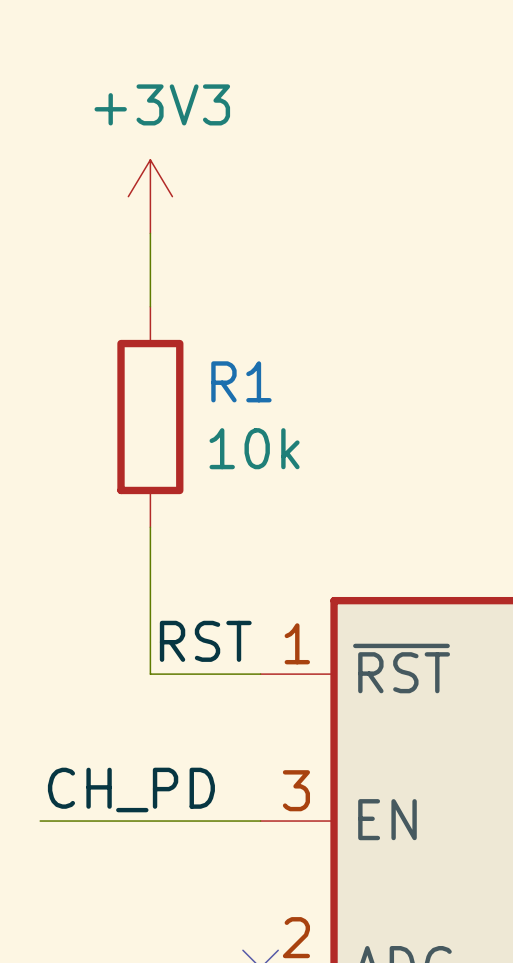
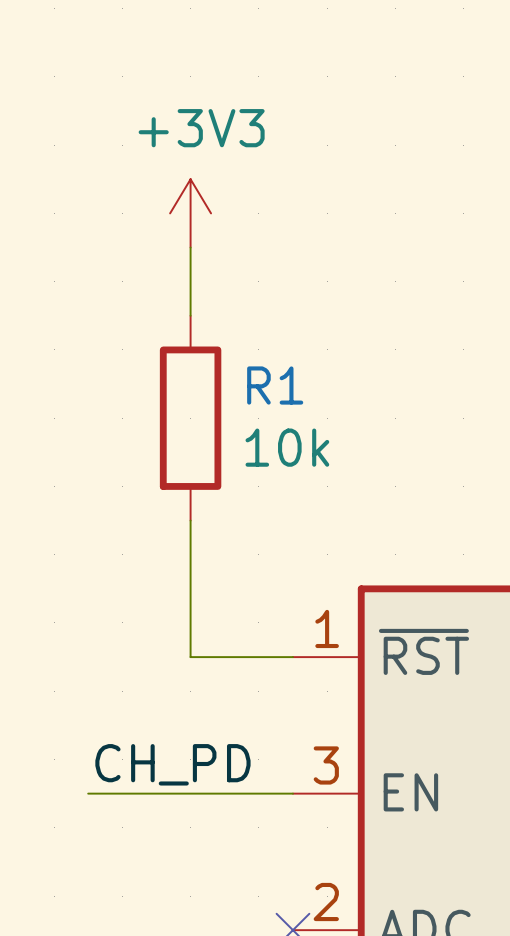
label: RST (205, 641) -> none

